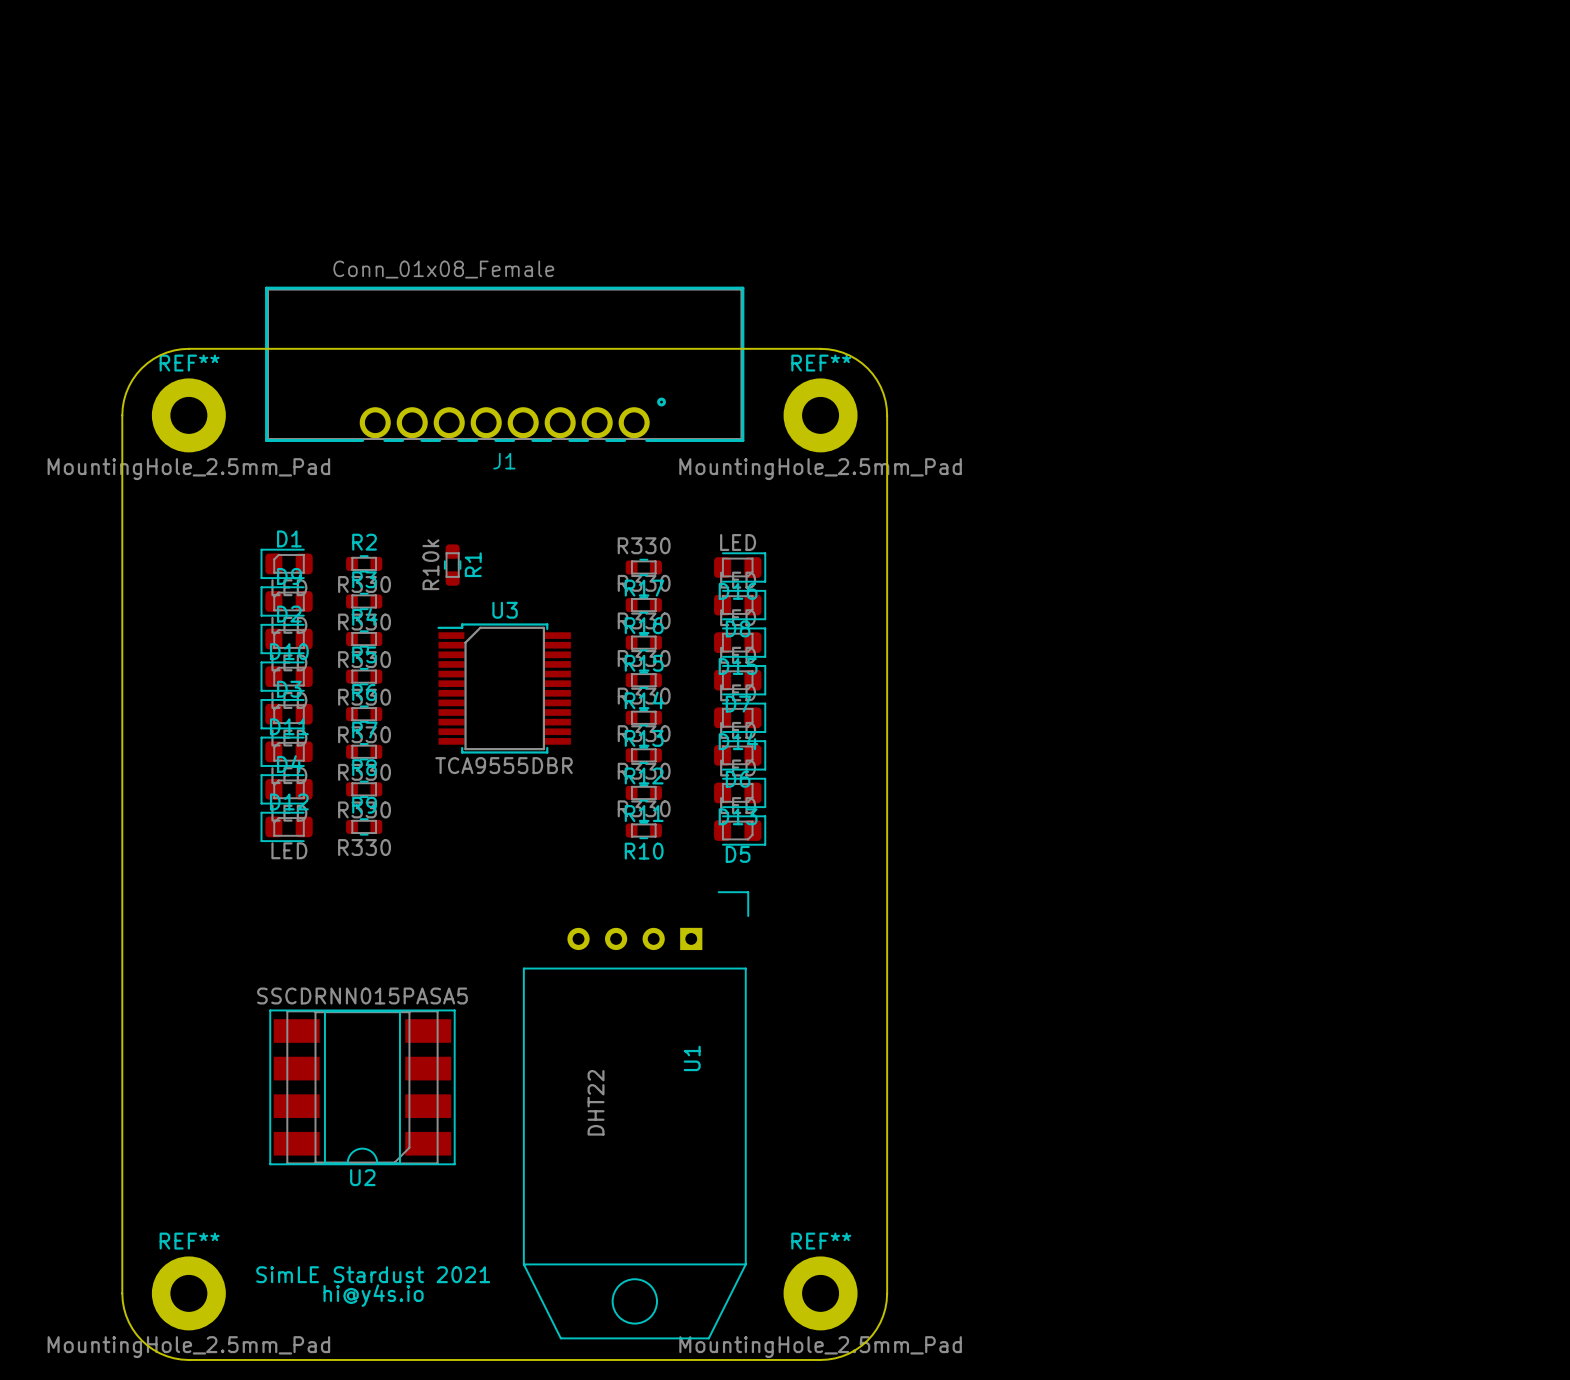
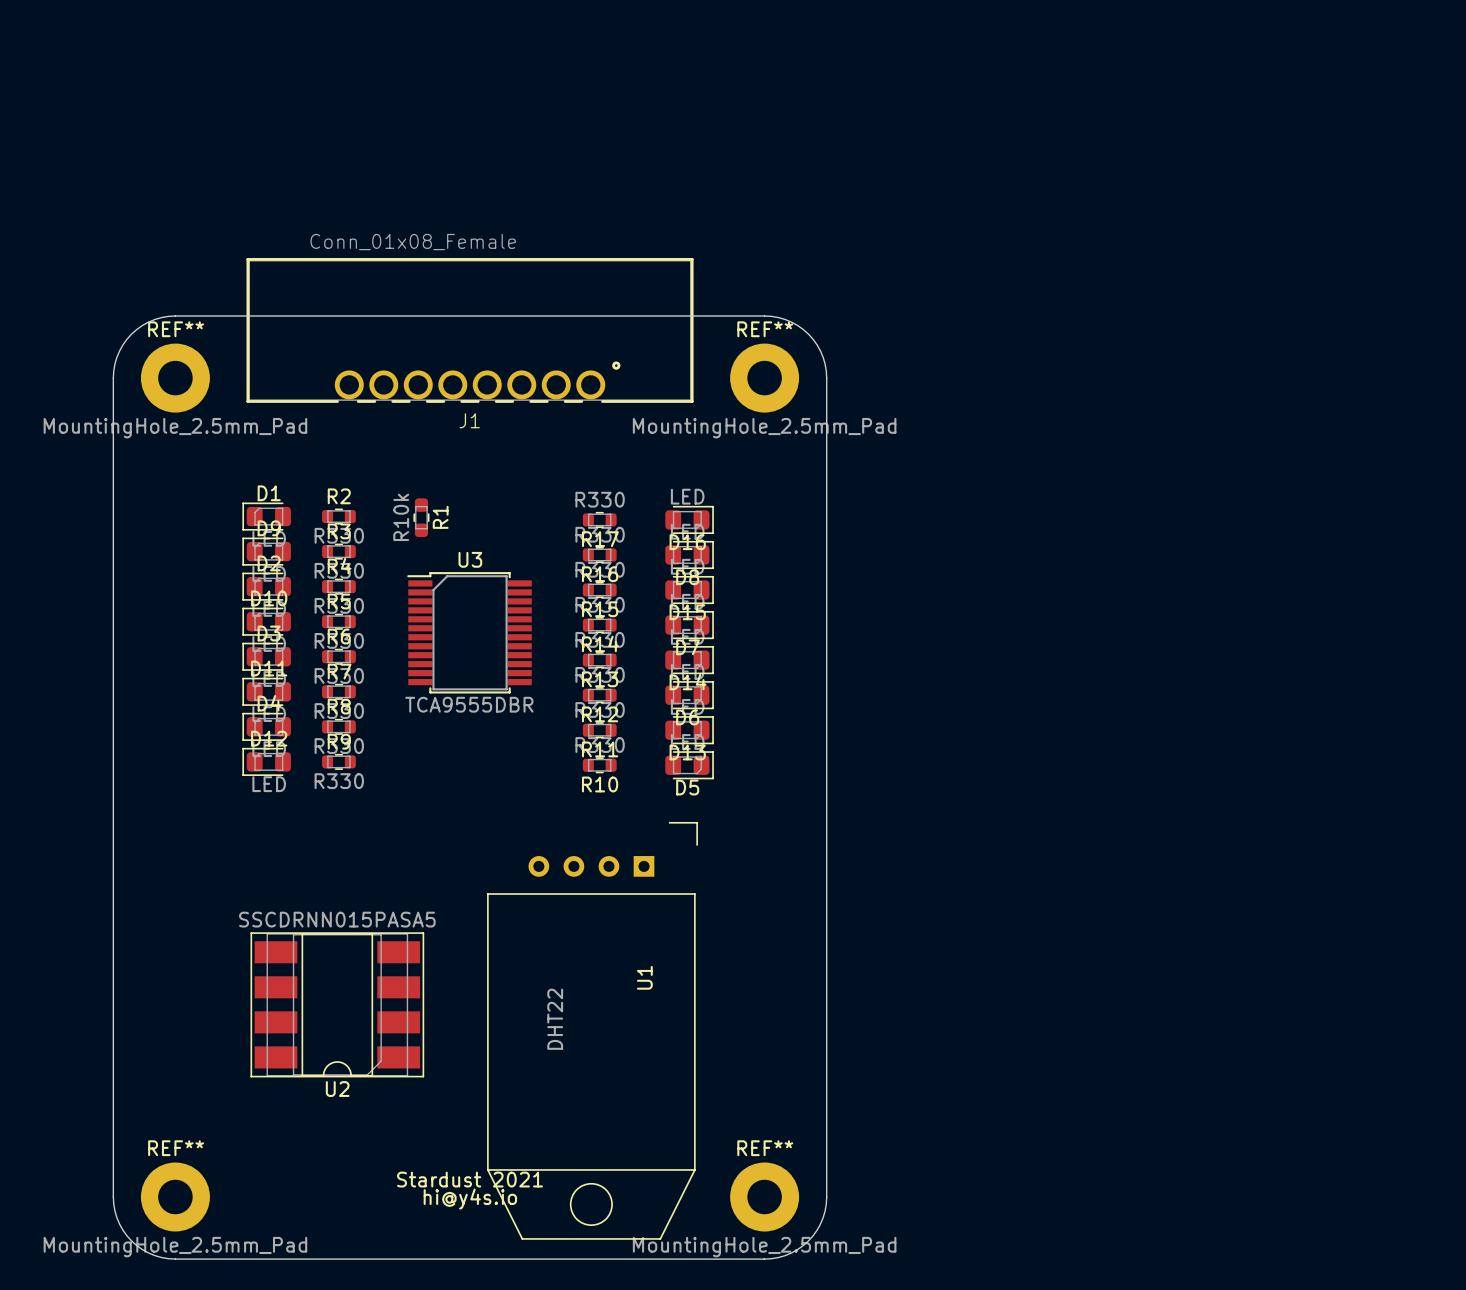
text: SimLE Stardust 2021 (373, 1274) -> Stardust 2021 (470, 1179)
text position: hi@y4s.io (373, 1295) -> hi@y4s.io (470, 1199)

